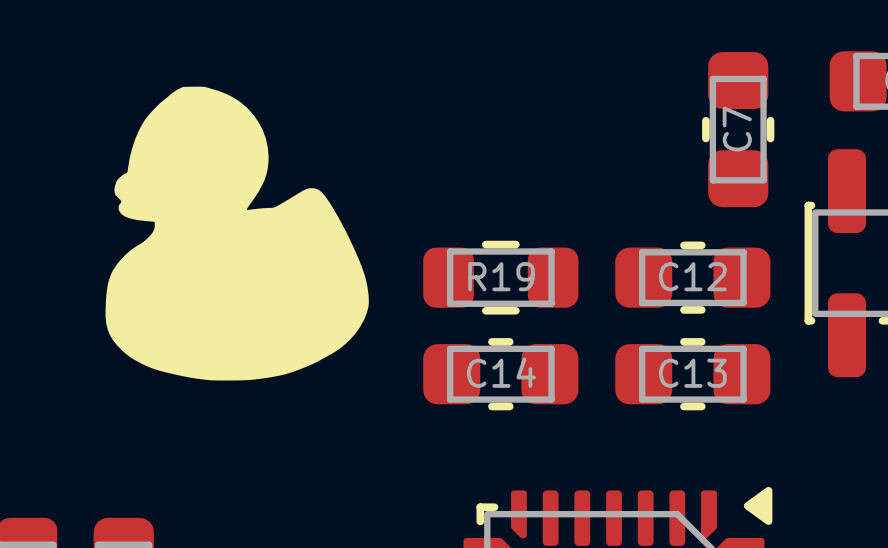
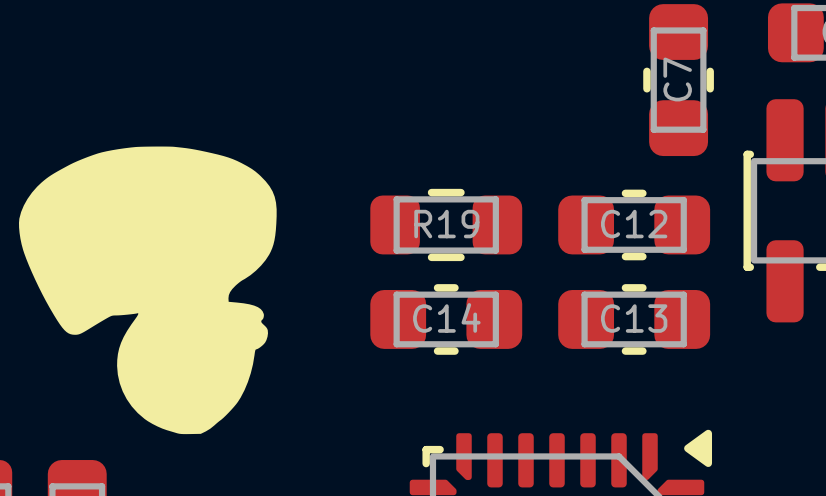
drawing: [105, 86, 369, 381] -> none
drawing: none -> [18, 146, 277, 435]

